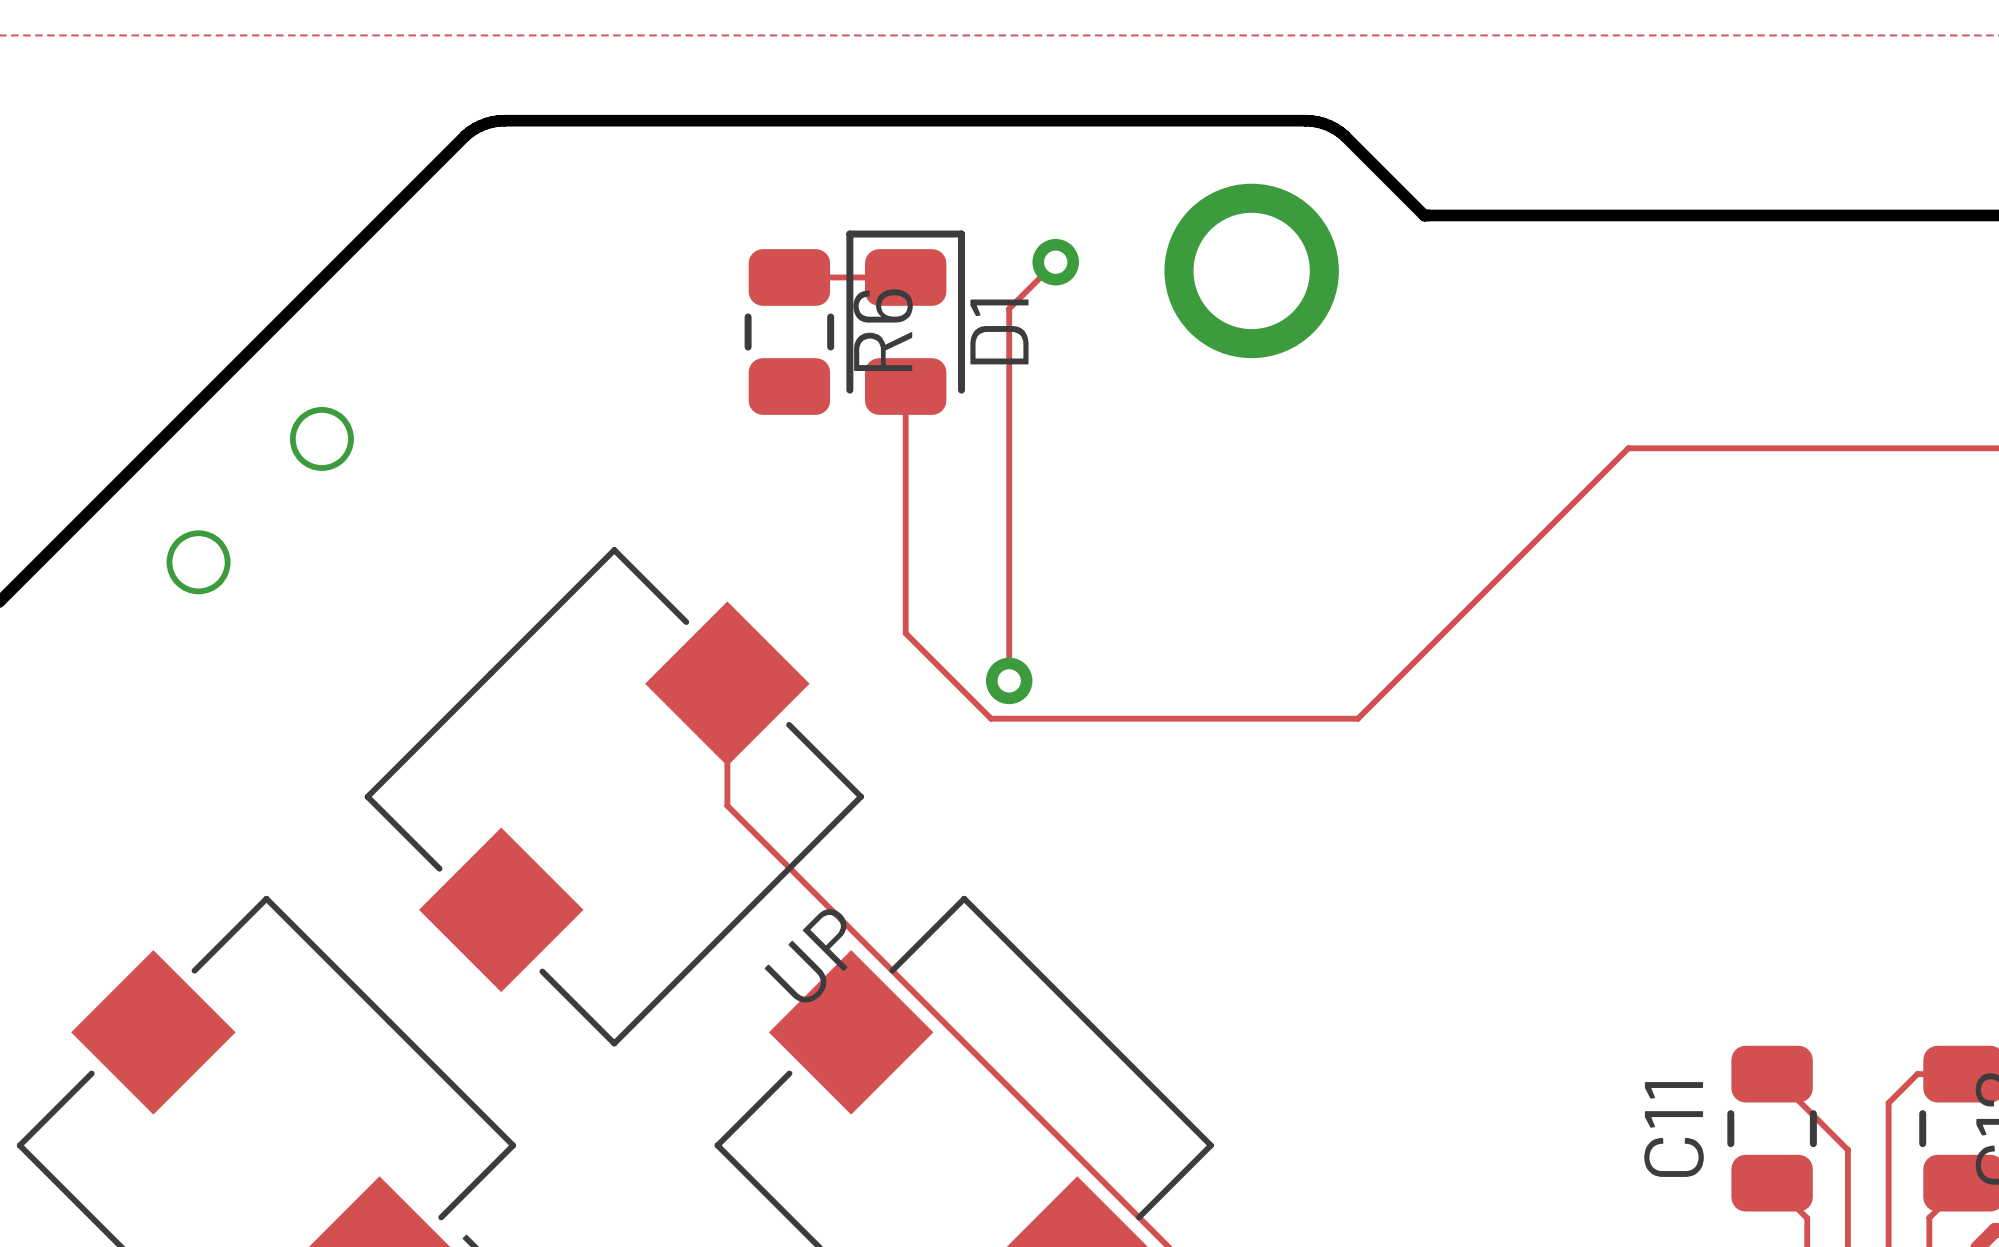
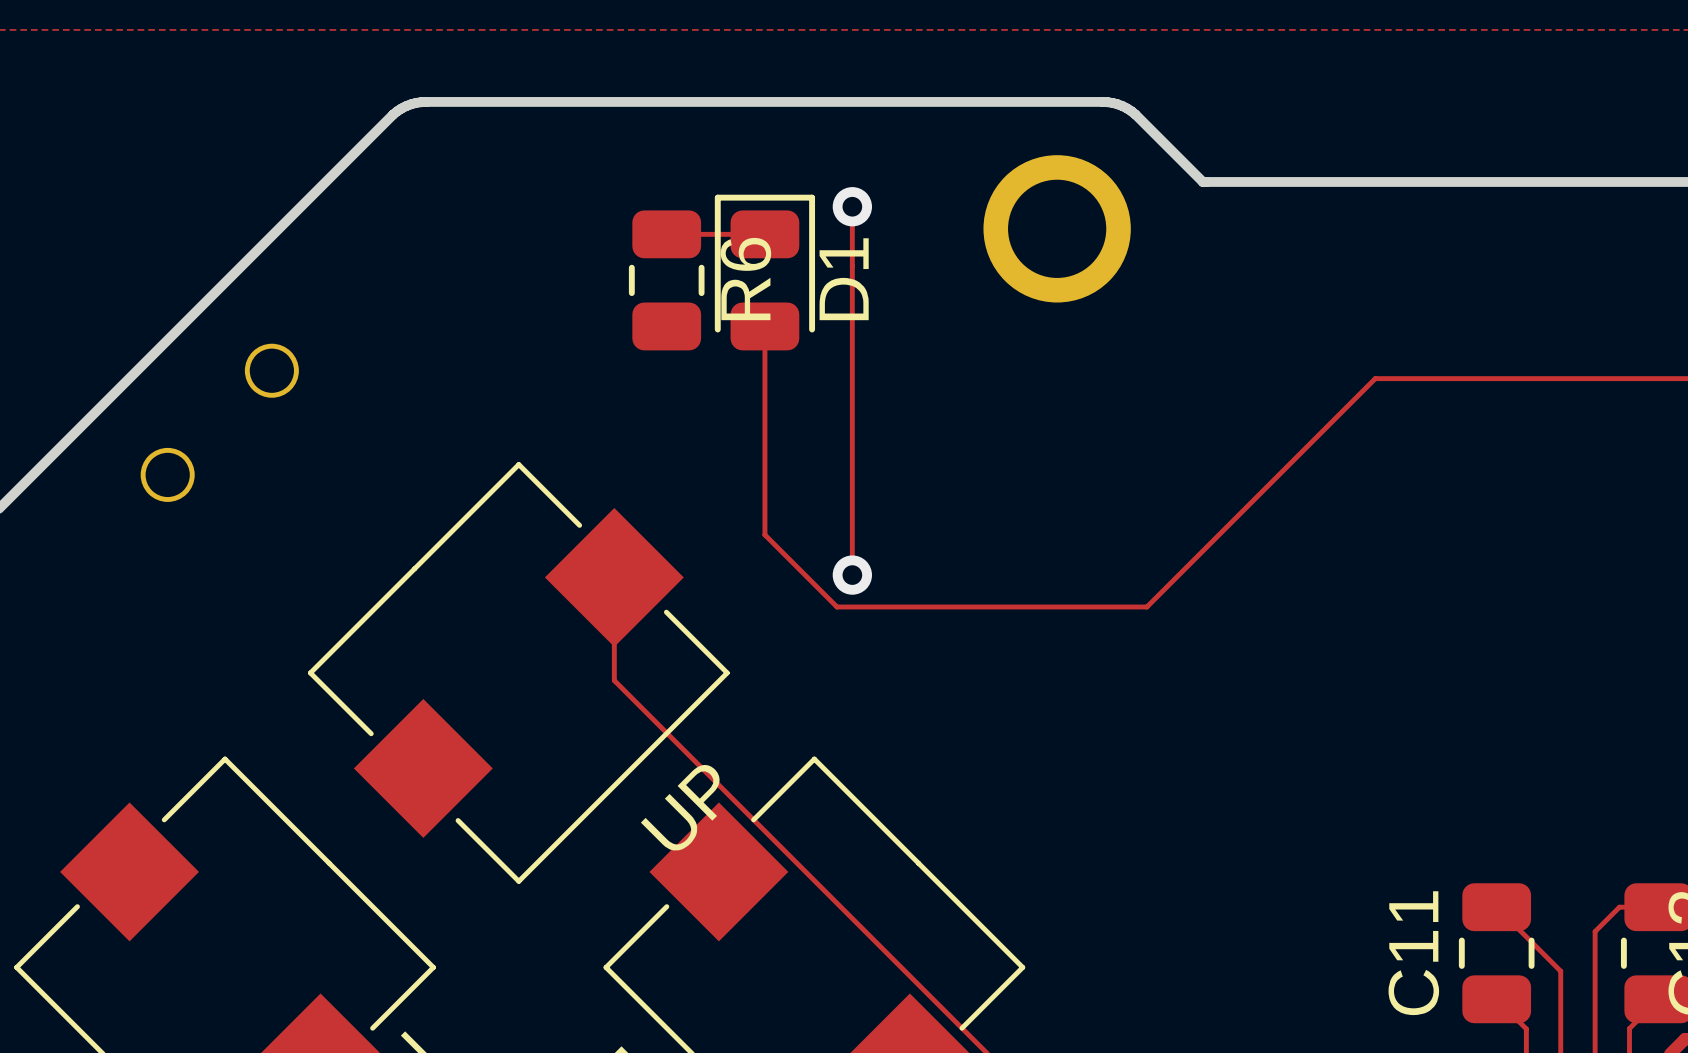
track: (1055, 262) (1009, 308) -> (852, 206) (852, 260)
via position: (1055, 262) -> (852, 206)

